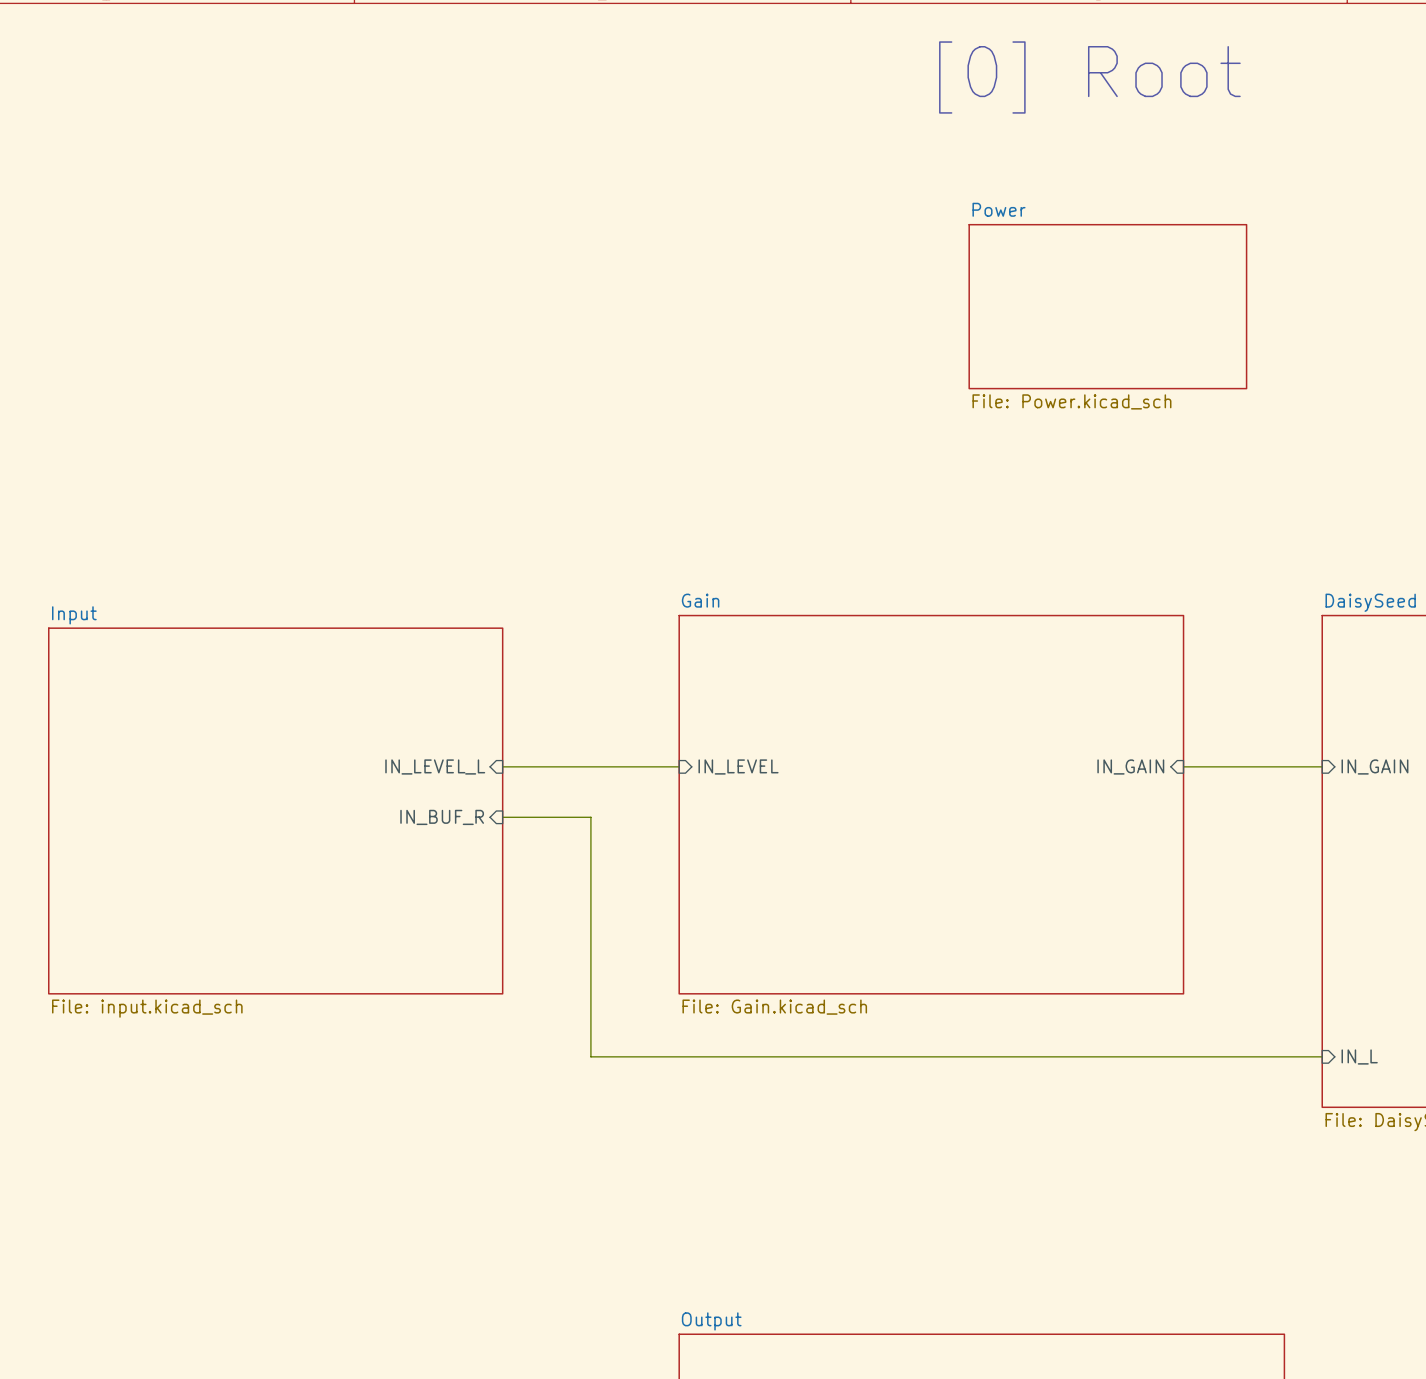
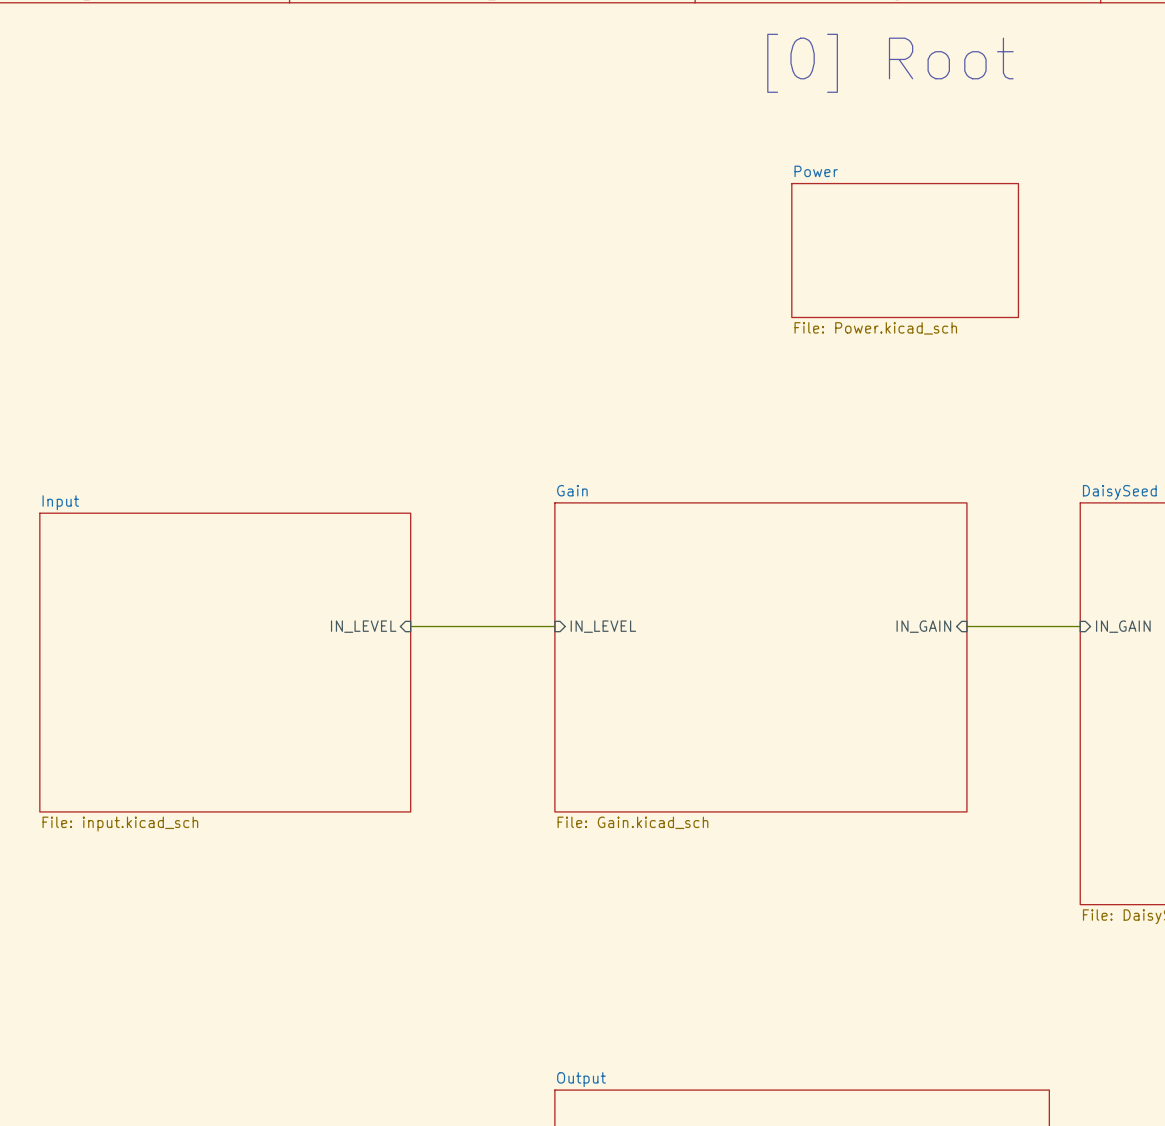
sheet pin: IN_LEVEL_L (435, 766) -> IN_LEVEL (363, 626)
sheet pin: IN_BUF_R (442, 817) -> none
wire: (502, 817) (590, 817) (590, 1056) (1322, 1056) -> none
sheet pin: IN_L (1359, 1056) -> none

